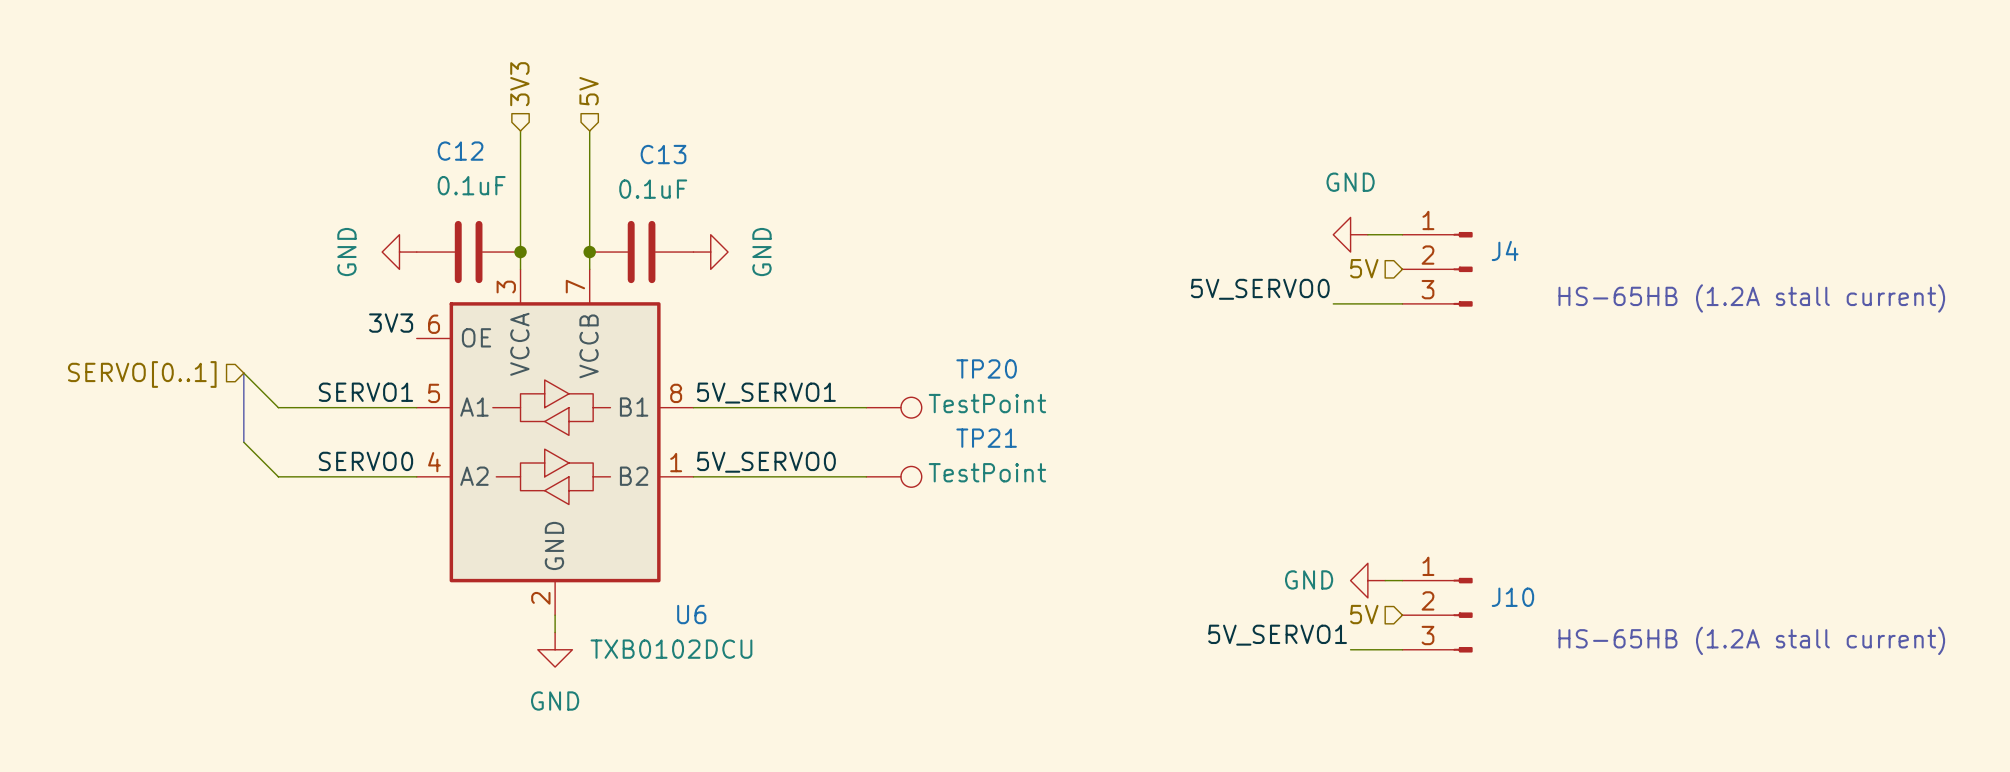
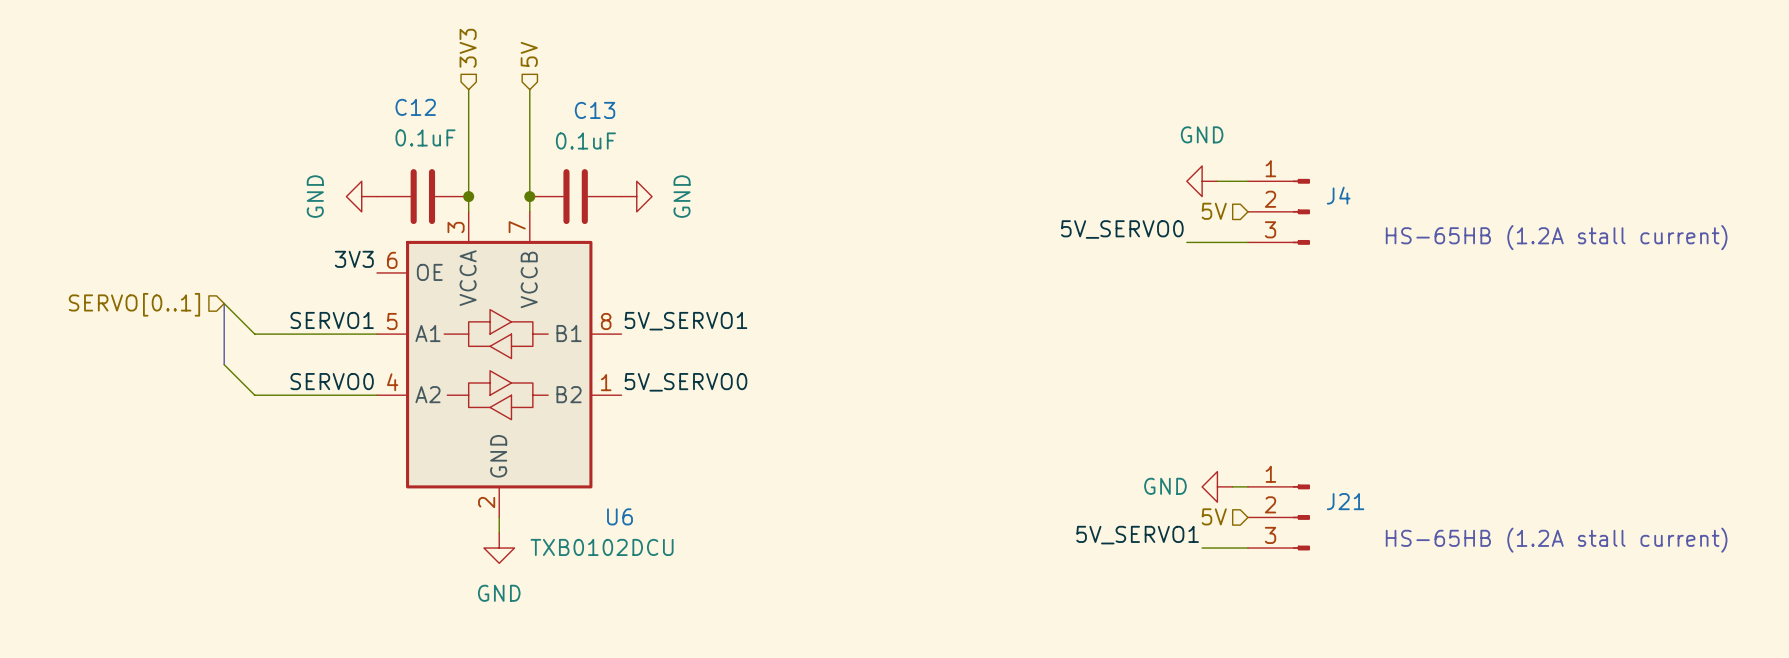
wire: (693, 407) (866, 407) -> none
TP20: TestPoint (894, 407) -> none
wire: (693, 476) (866, 476) -> none
TP21: TestPoint (894, 476) -> none
J10 name: J10 (1512, 597) -> J21 (1345, 501)

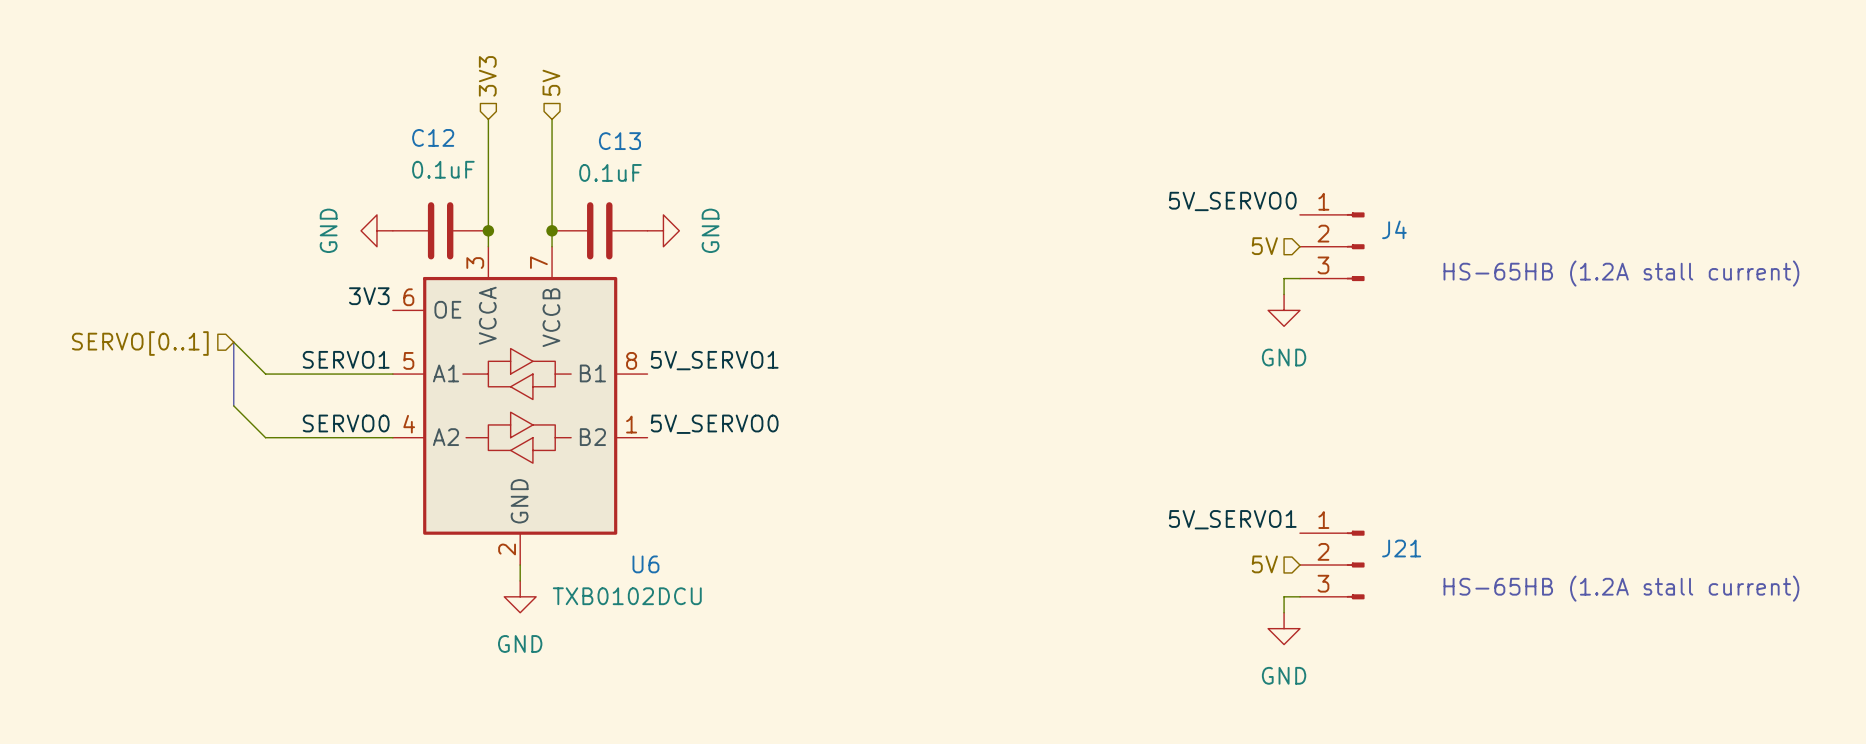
power symbol text position: GND (1202, 134) -> GND (1284, 357)
power symbol rotation: 0° (1202, 181) -> 90° counterclockwise (1284, 310)
power symbol position: GND (1202, 181) -> GND (1284, 310)
wire: (1217, 181) (1247, 181) -> none
label position: 5V_SERVO0 (1122, 229) -> 5V_SERVO0 (1232, 201)
wire: (1186, 242) (1232, 242) -> (1284, 294) (1284, 278)
power symbol rotation: 0° (1217, 486) -> 90° counterclockwise (1284, 628)
power symbol position: GND (1217, 486) -> GND (1284, 628)
wire: (1232, 486) (1247, 486) -> none
label position: 5V_SERVO1 (1137, 535) -> 5V_SERVO1 (1232, 519)
wire: (1202, 548) (1232, 548) -> (1284, 612) (1284, 596)

